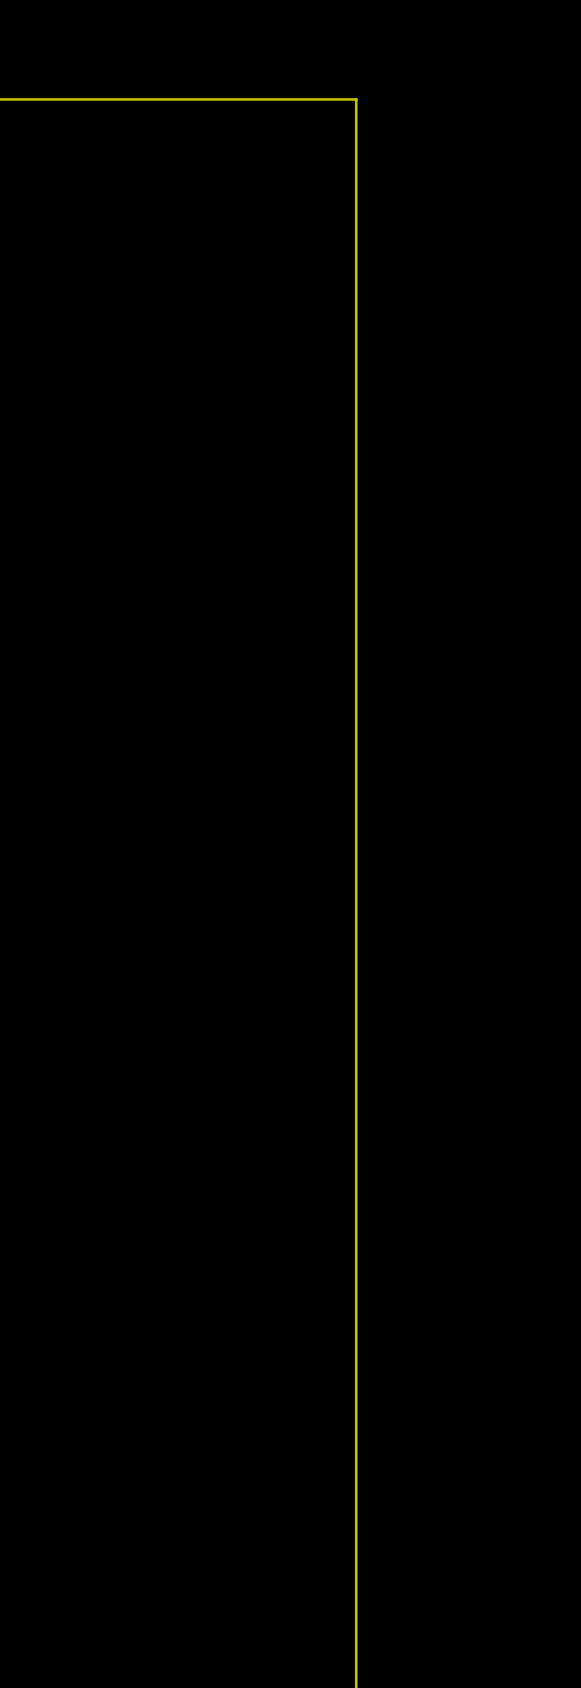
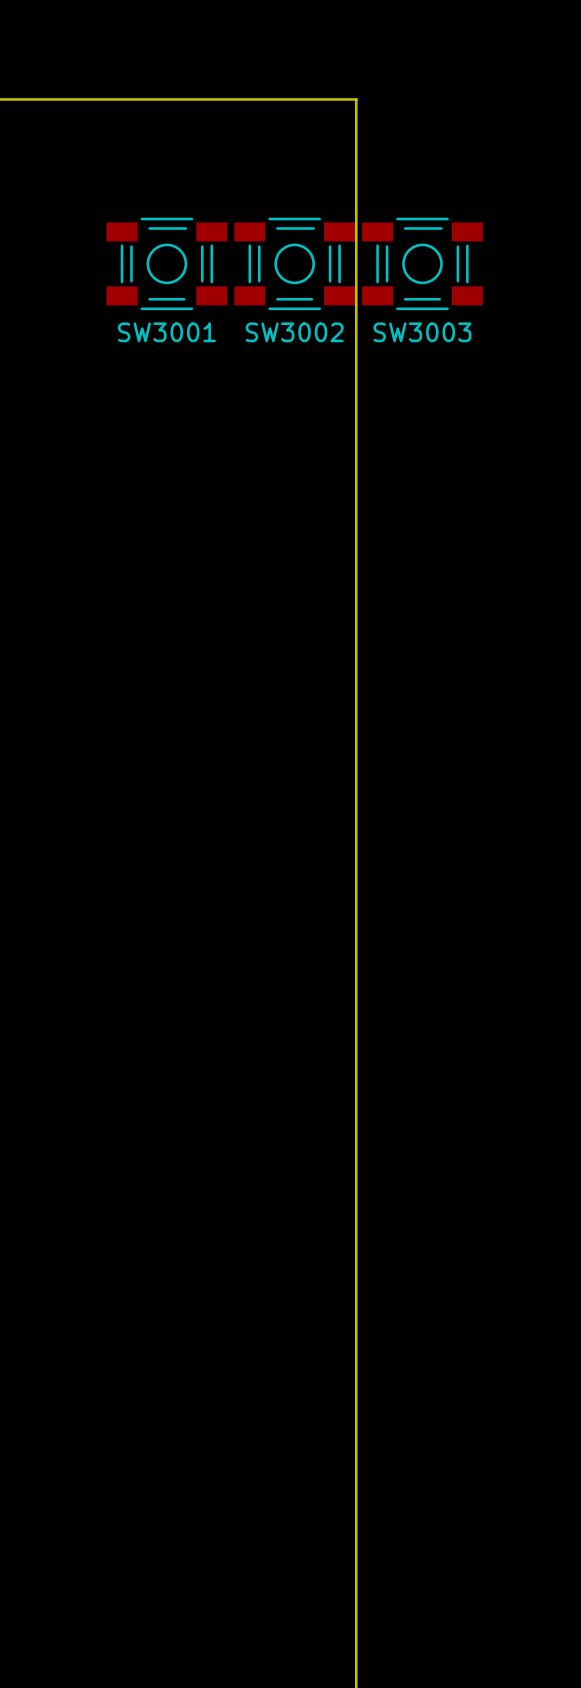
SW3001: none -> (166, 263)
SW3002: none -> (294, 263)
SW3003: none -> (422, 263)

